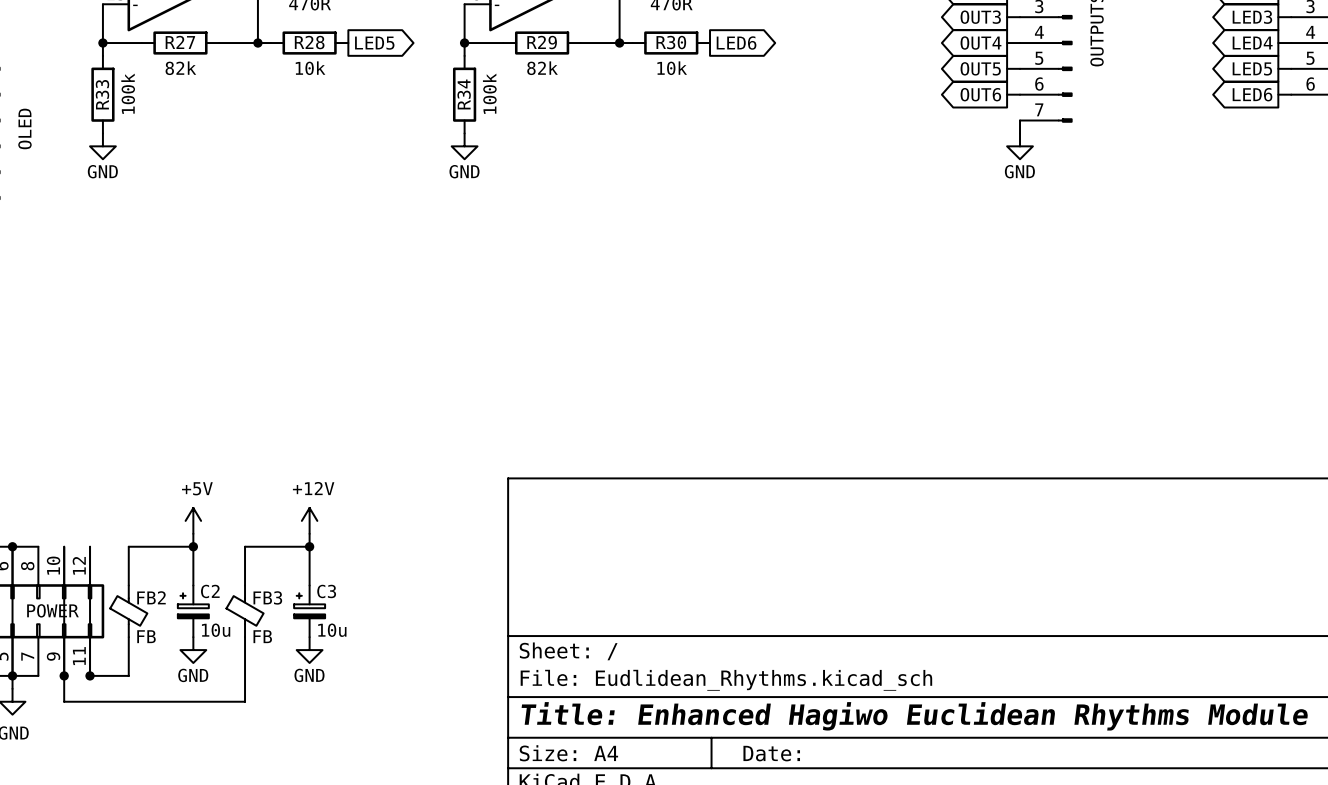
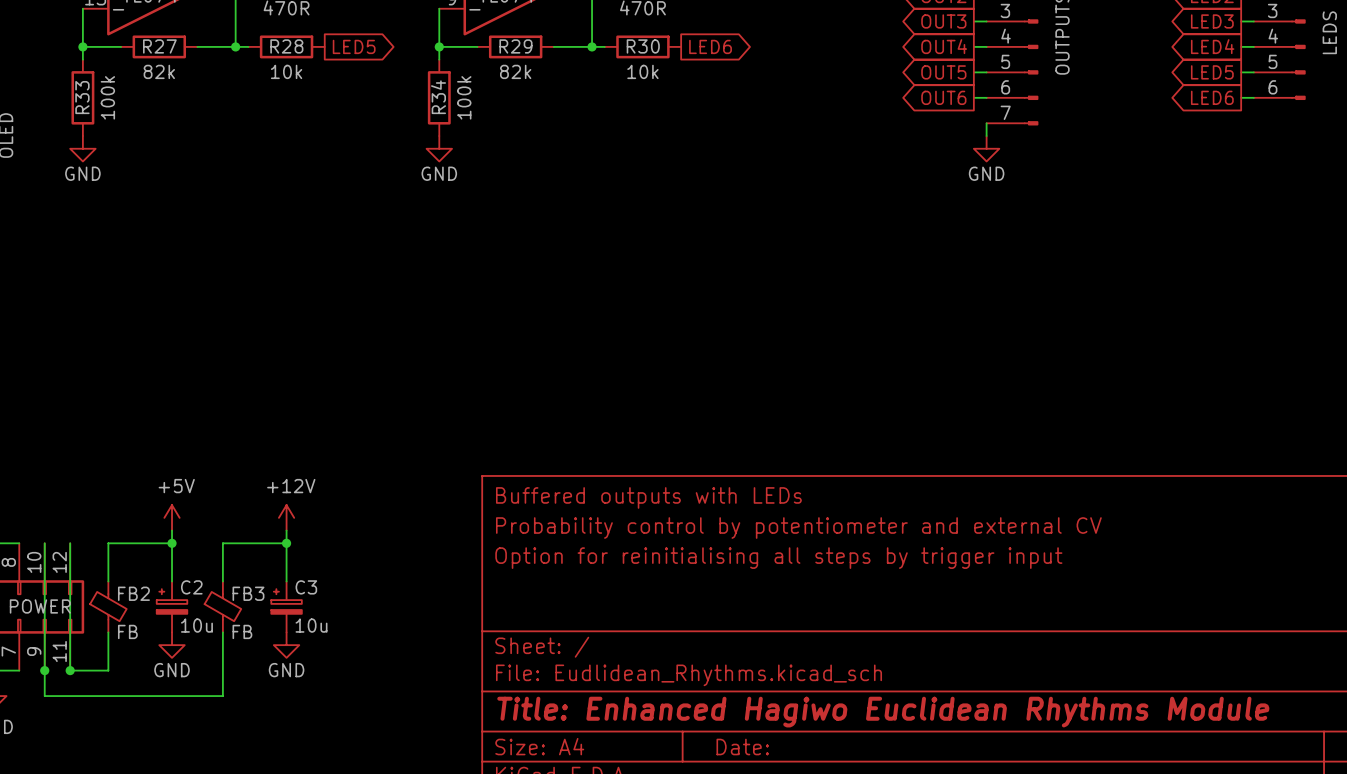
title block: none -> Buffered outputs with LEDs (648, 497)
title block: none -> Probability control by potentiometer and external CV (798, 528)
title block: none -> Option for reinitialising all steps by trigger input (778, 558)

